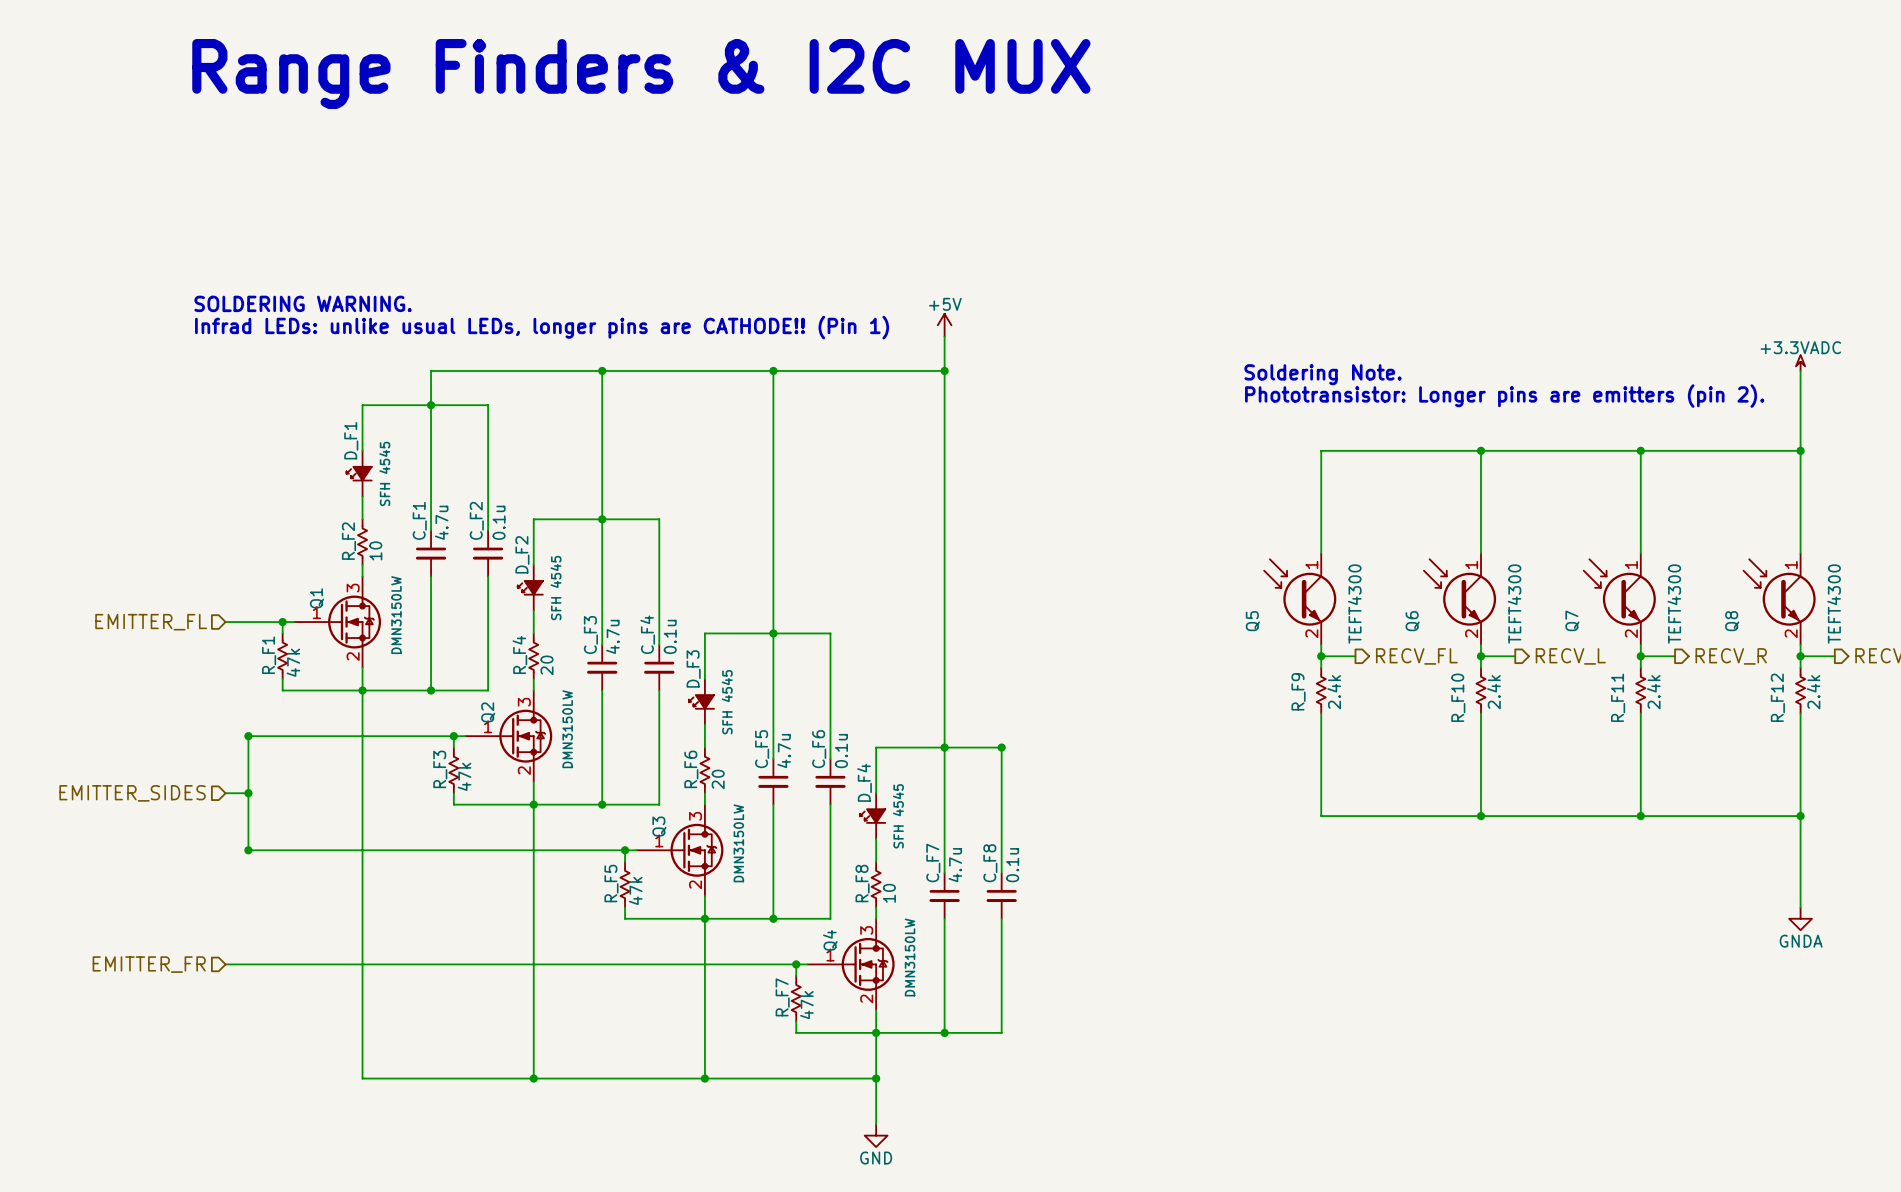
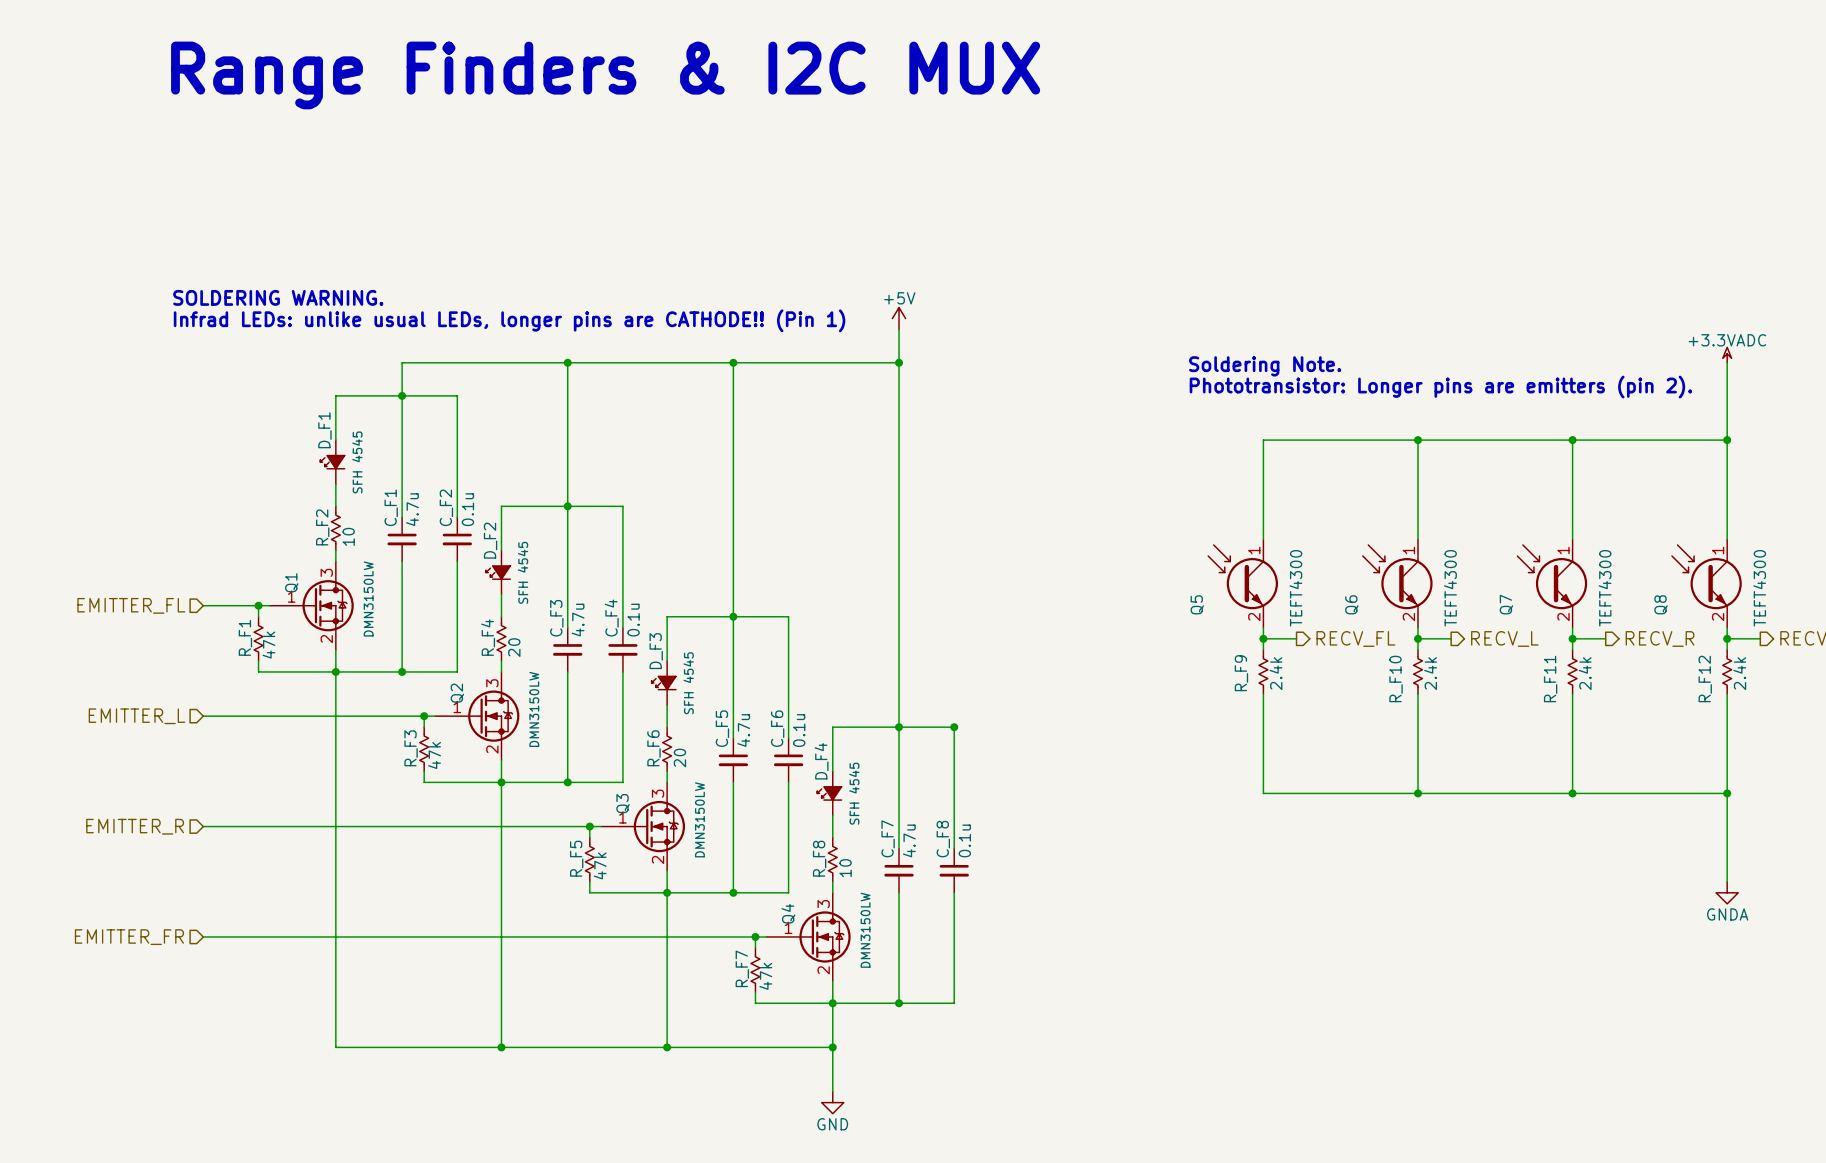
hierarchical label: none -> EMITTER_L (137, 716)
wire: (248, 736) (248, 850) -> (225, 716) (203, 716)
junction: (248, 736) -> none
hierarchical label: EMITTER_SIDES (132, 793) -> none
wire: (225, 793) (248, 793) -> (203, 826) (225, 826)
junction: (248, 793) -> none
hierarchical label: none -> EMITTER_R (135, 826)
junction: (248, 850) -> none

